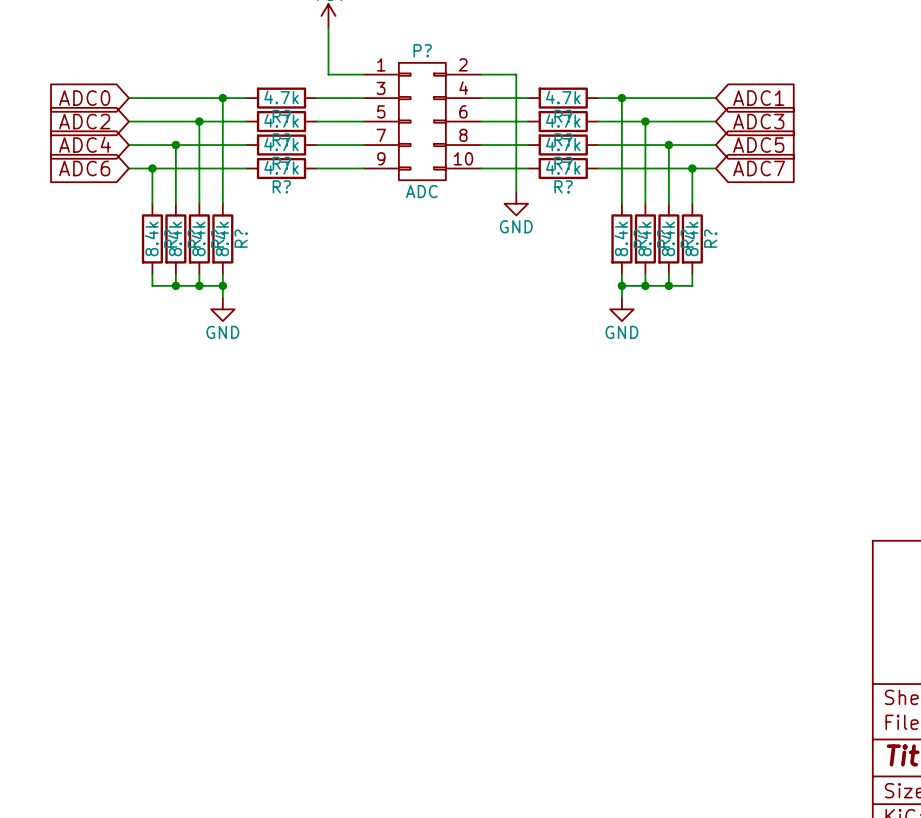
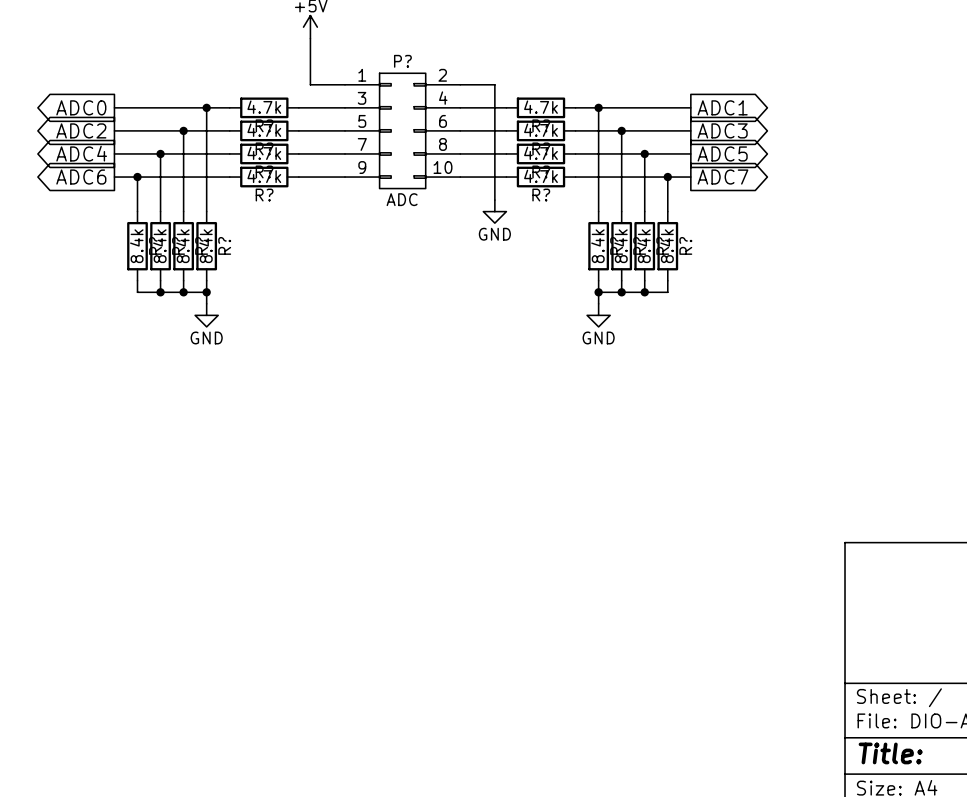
global label shape: input (84, 98) -> output (81, 107)
global label shape: input (758, 98) -> output (722, 107)
global label shape: input (84, 121) -> output (81, 130)
global label shape: input (758, 121) -> output (722, 130)
global label shape: input (85, 144) -> output (81, 153)
global label shape: input (758, 145) -> output (722, 153)
global label shape: input (84, 168) -> output (81, 177)
global label shape: input (759, 168) -> output (722, 177)

